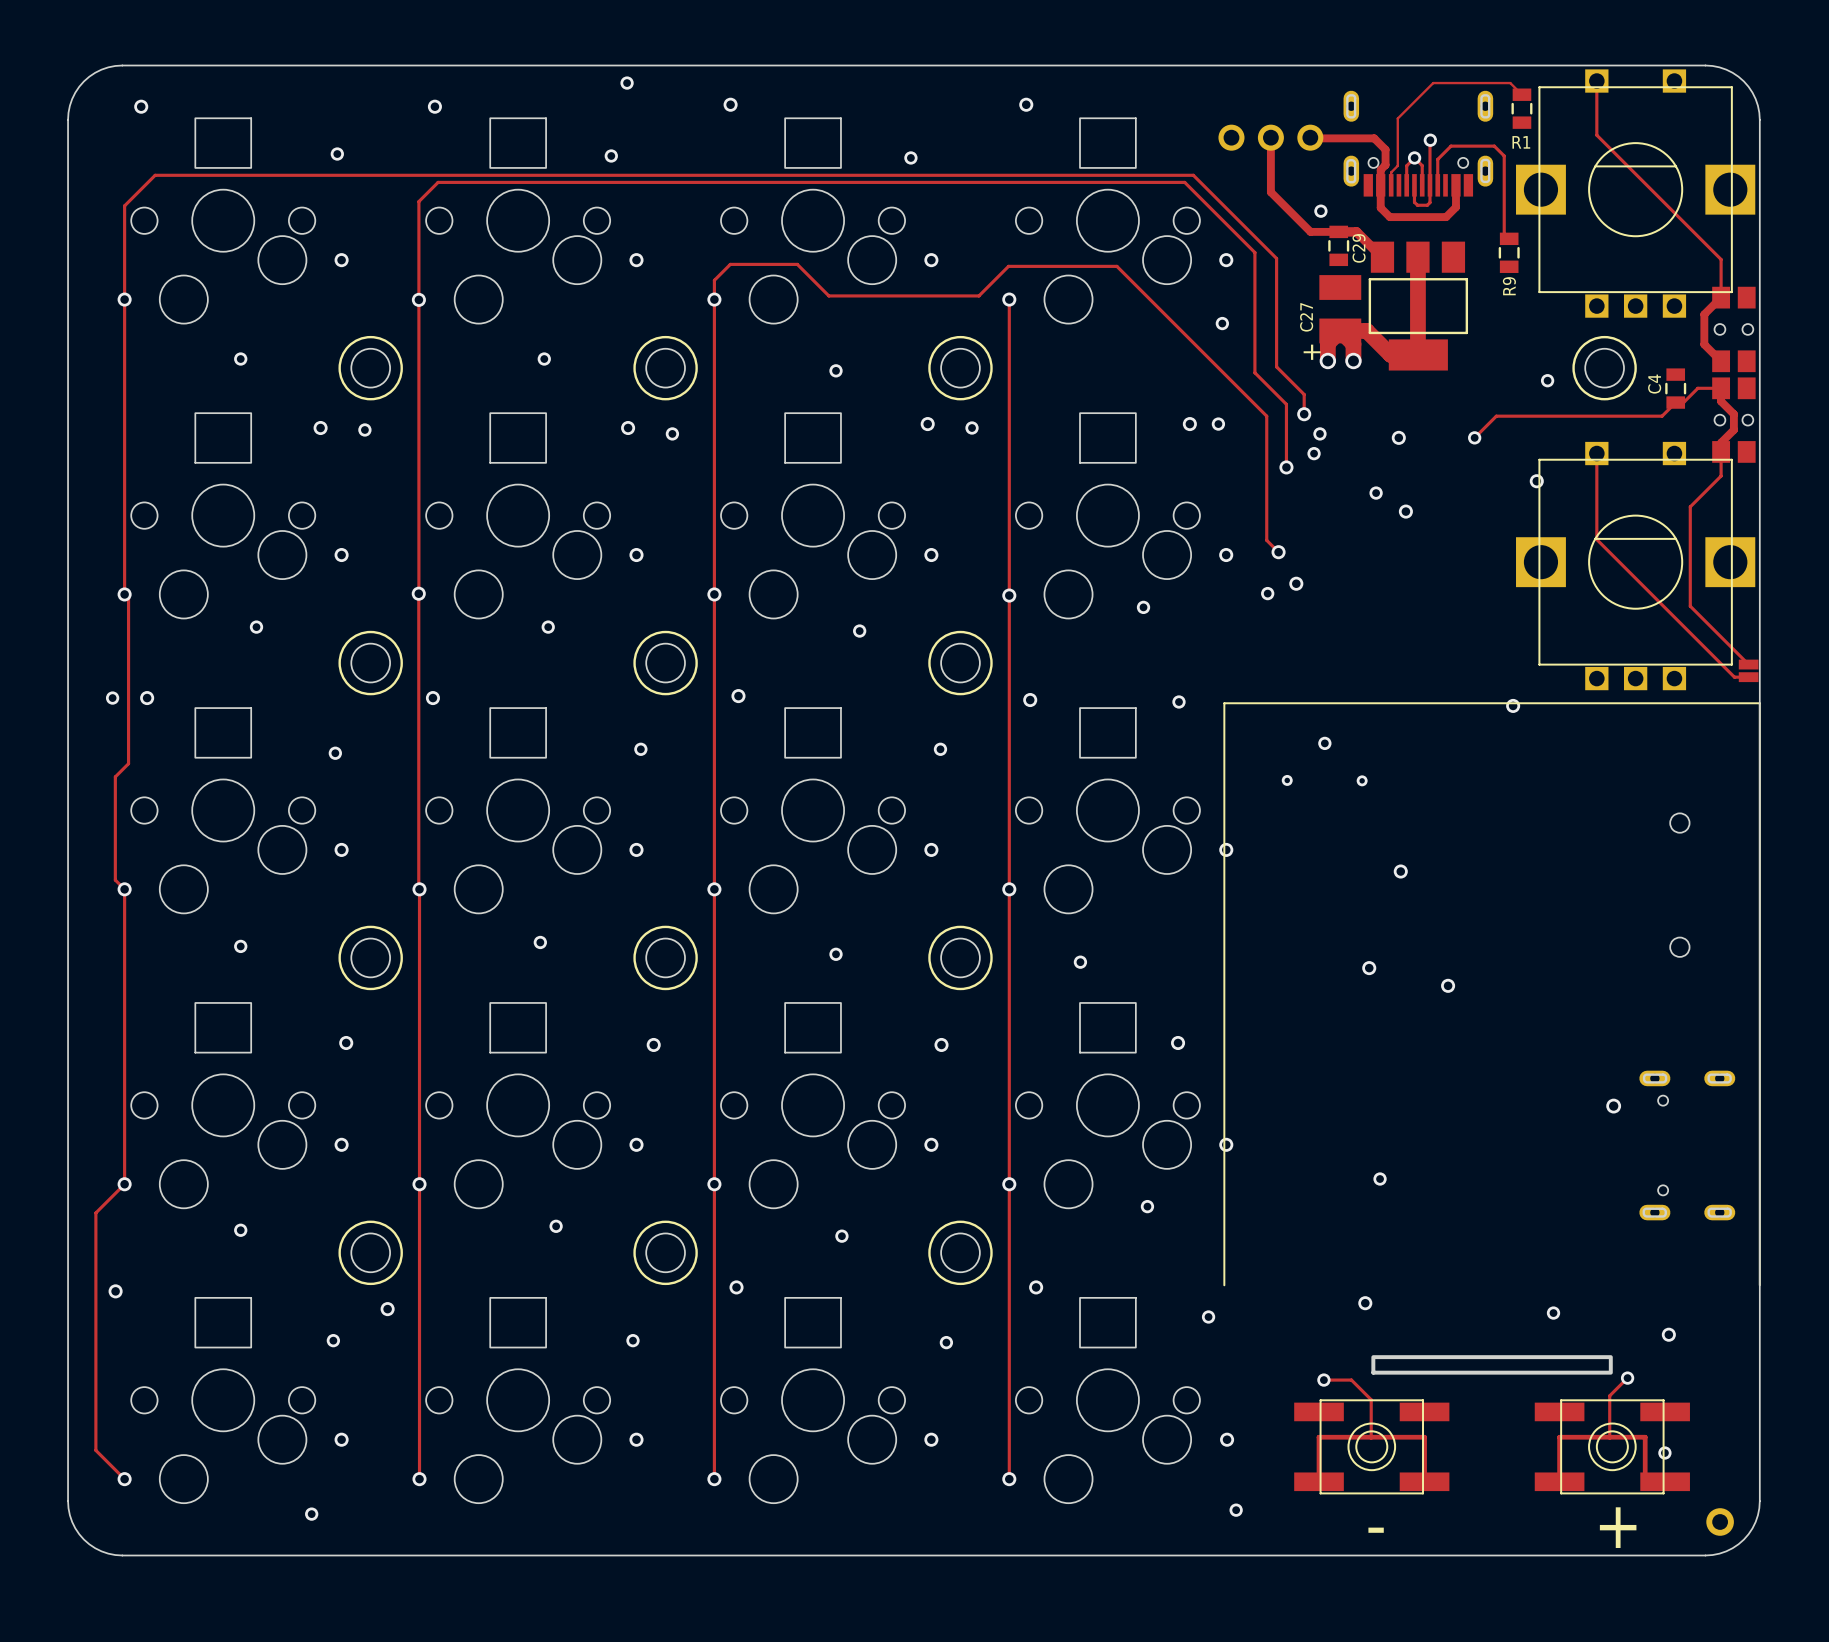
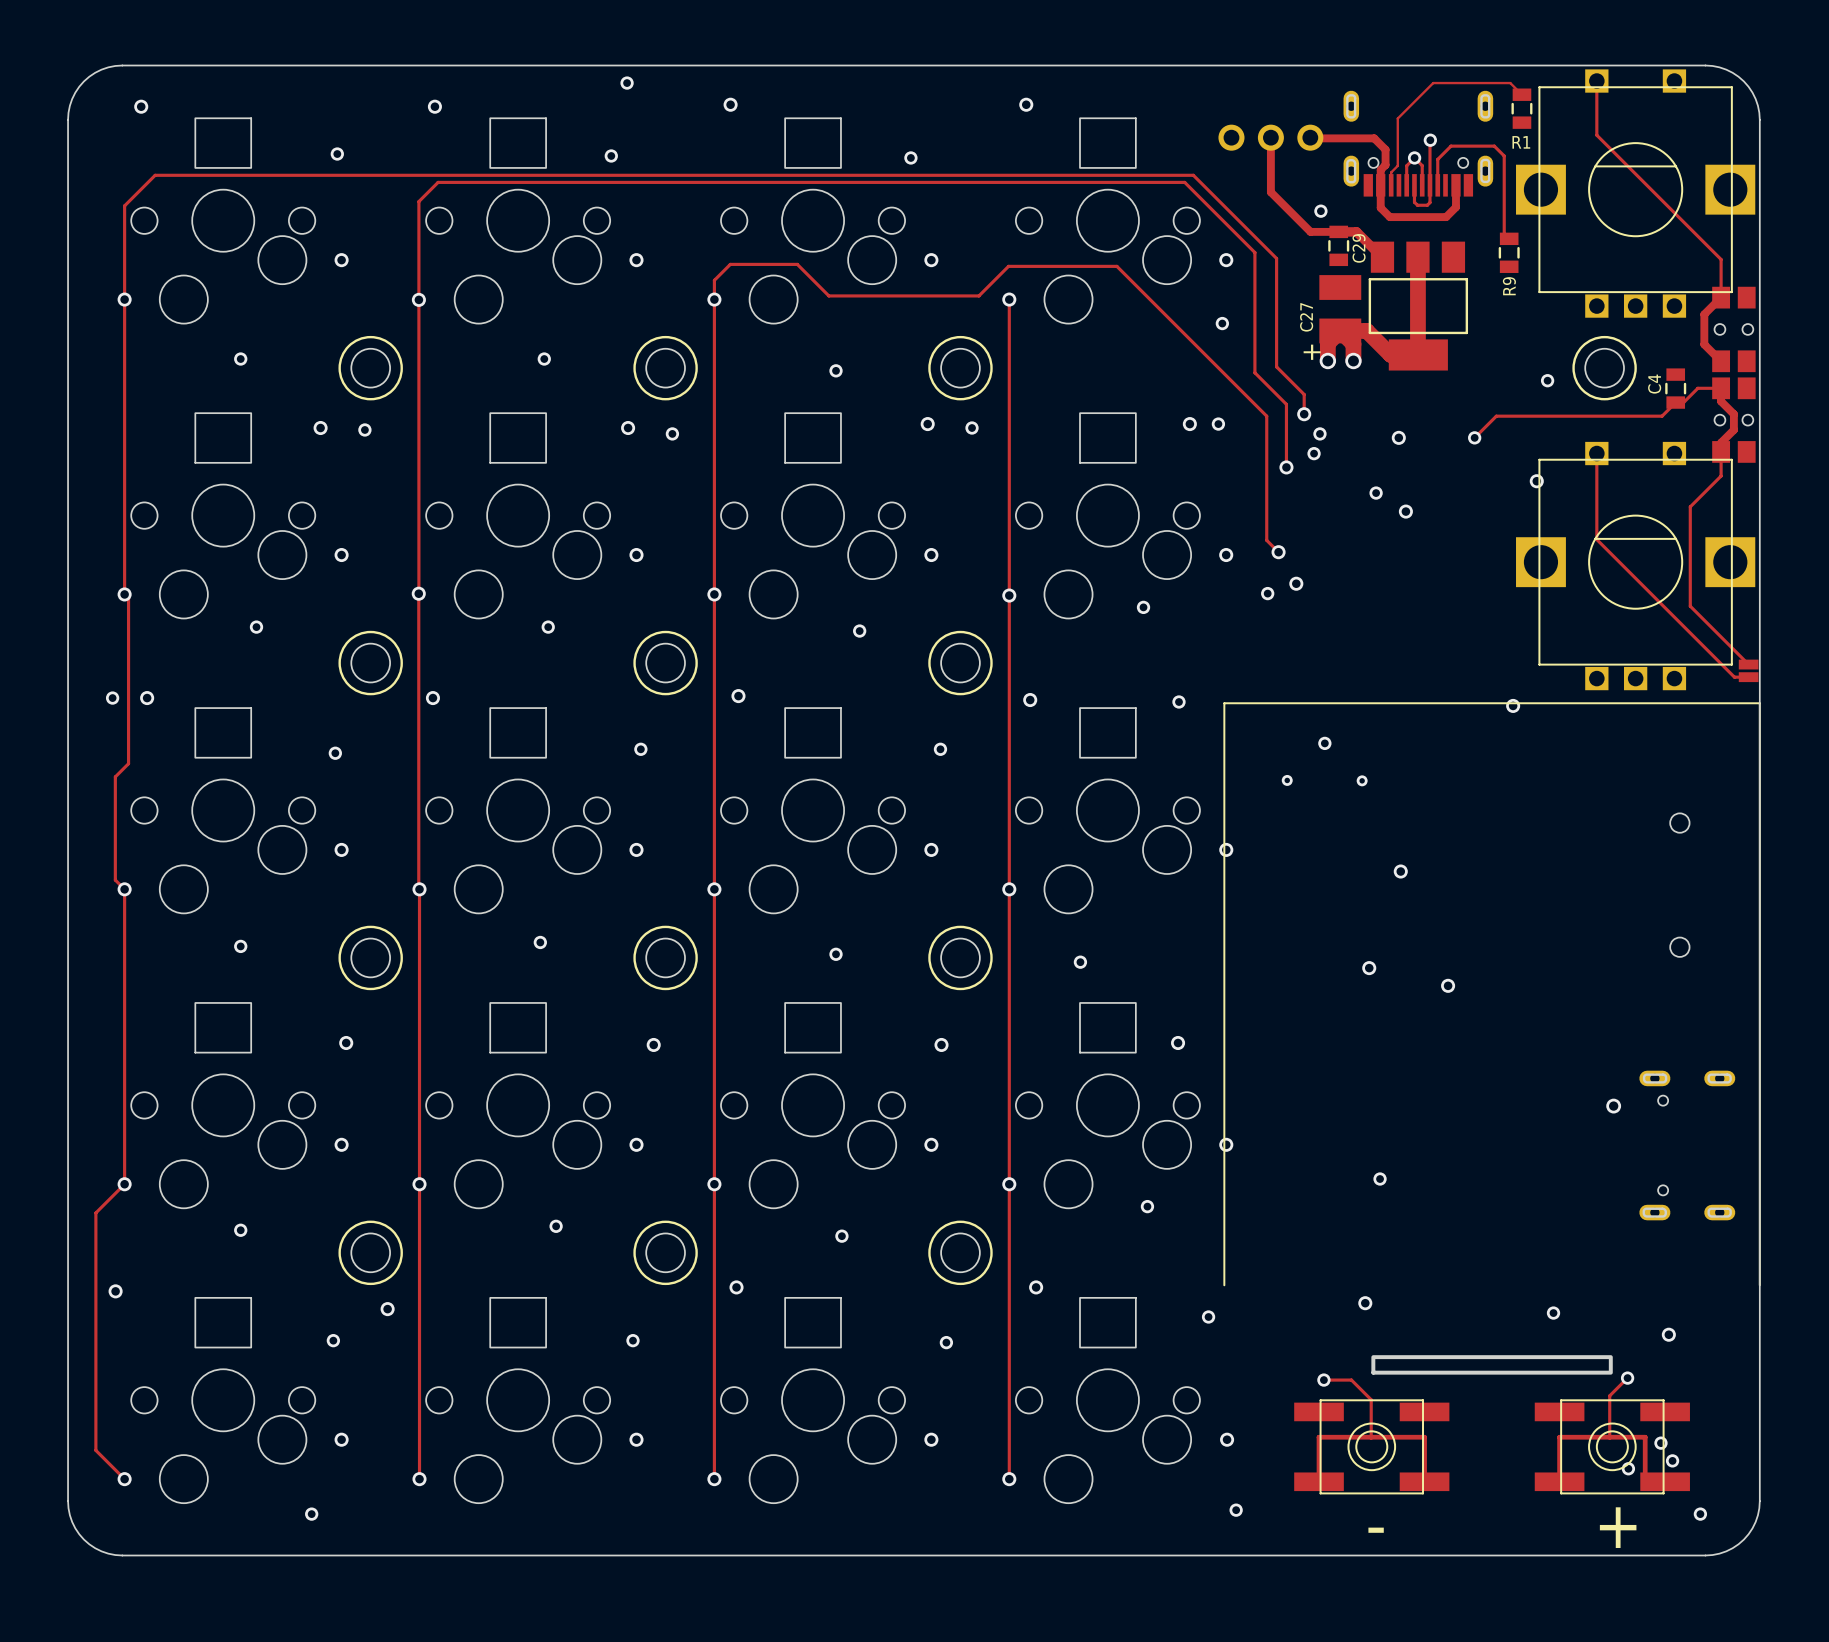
via: none -> (1660, 1443)
via: (1664, 1453) -> none
via: none -> (1672, 1460)
via: none -> (1628, 1468)
via: none -> (1700, 1514)
part: (1720, 1521) -> none

